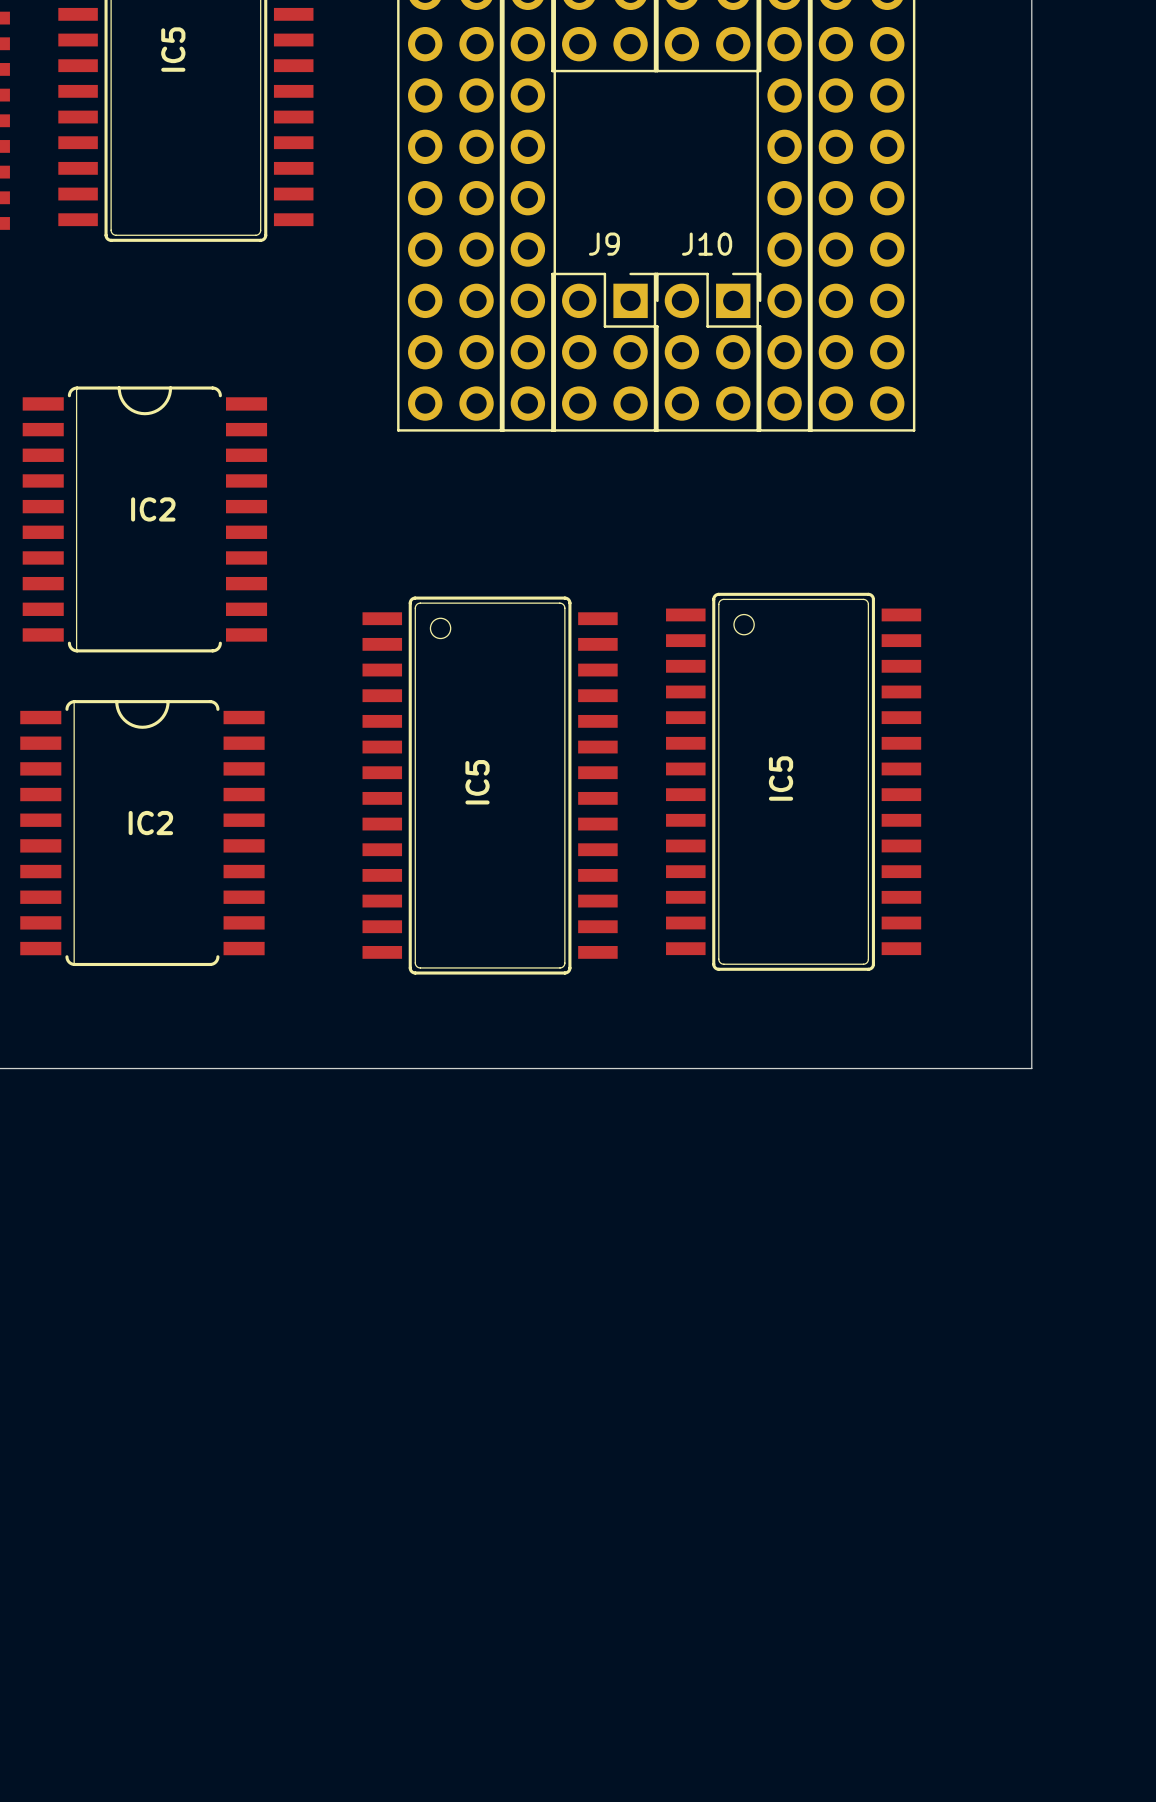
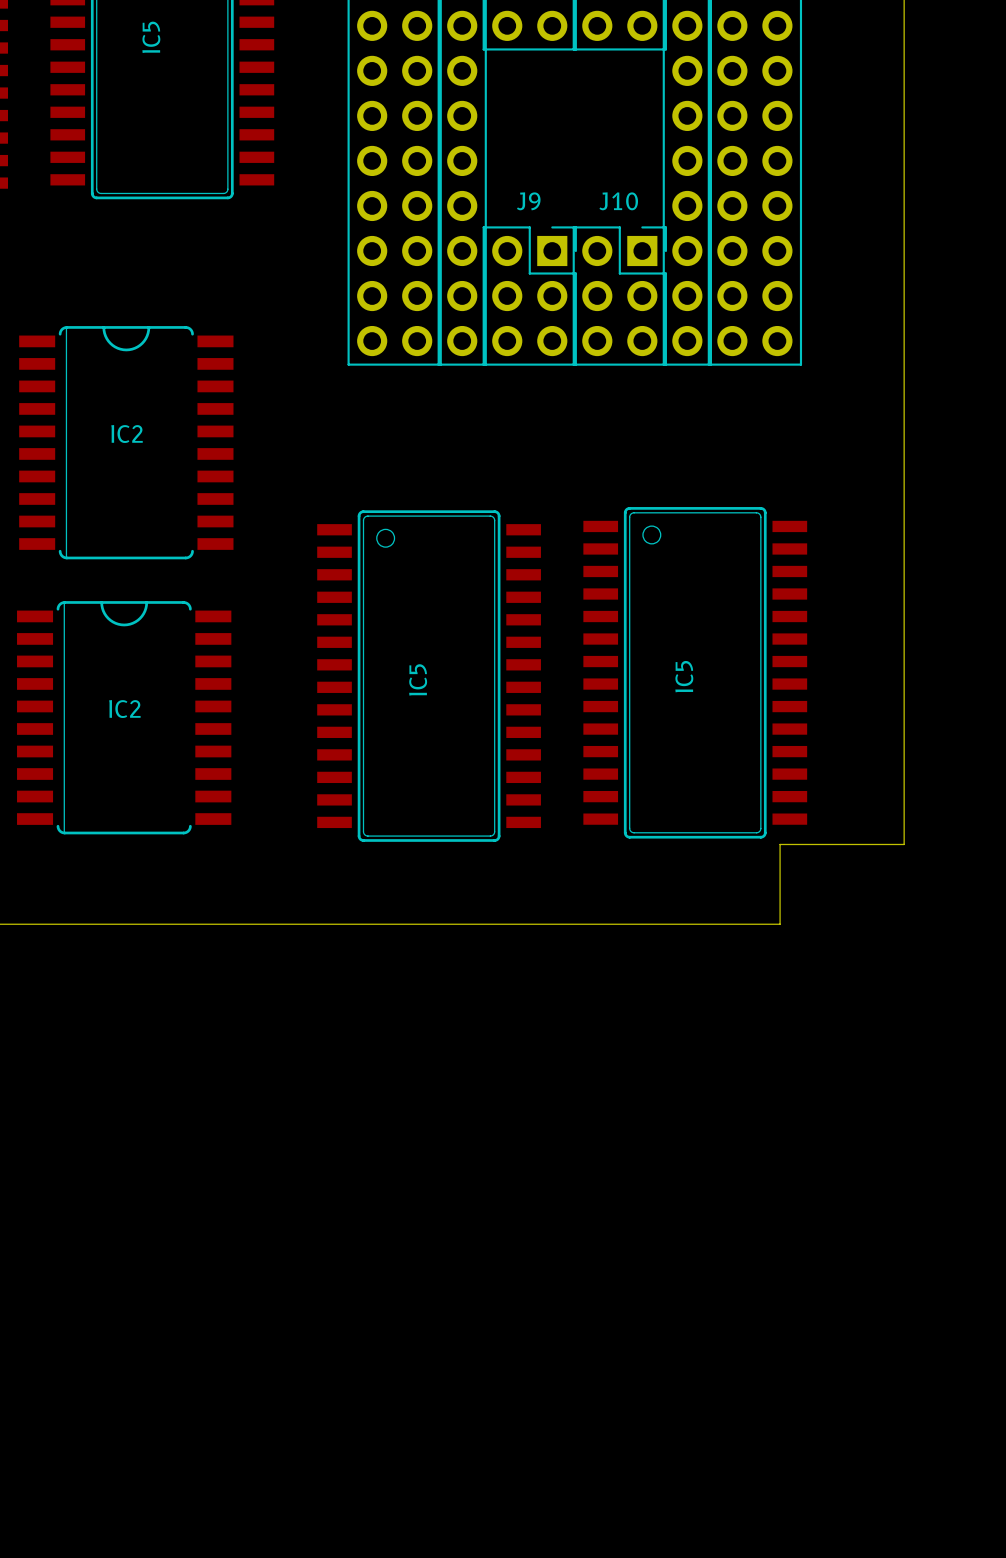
board edge: (1031, 977) (1031, 1068) (890, 1068) -> (904, 844) (780, 844) (780, 924)

